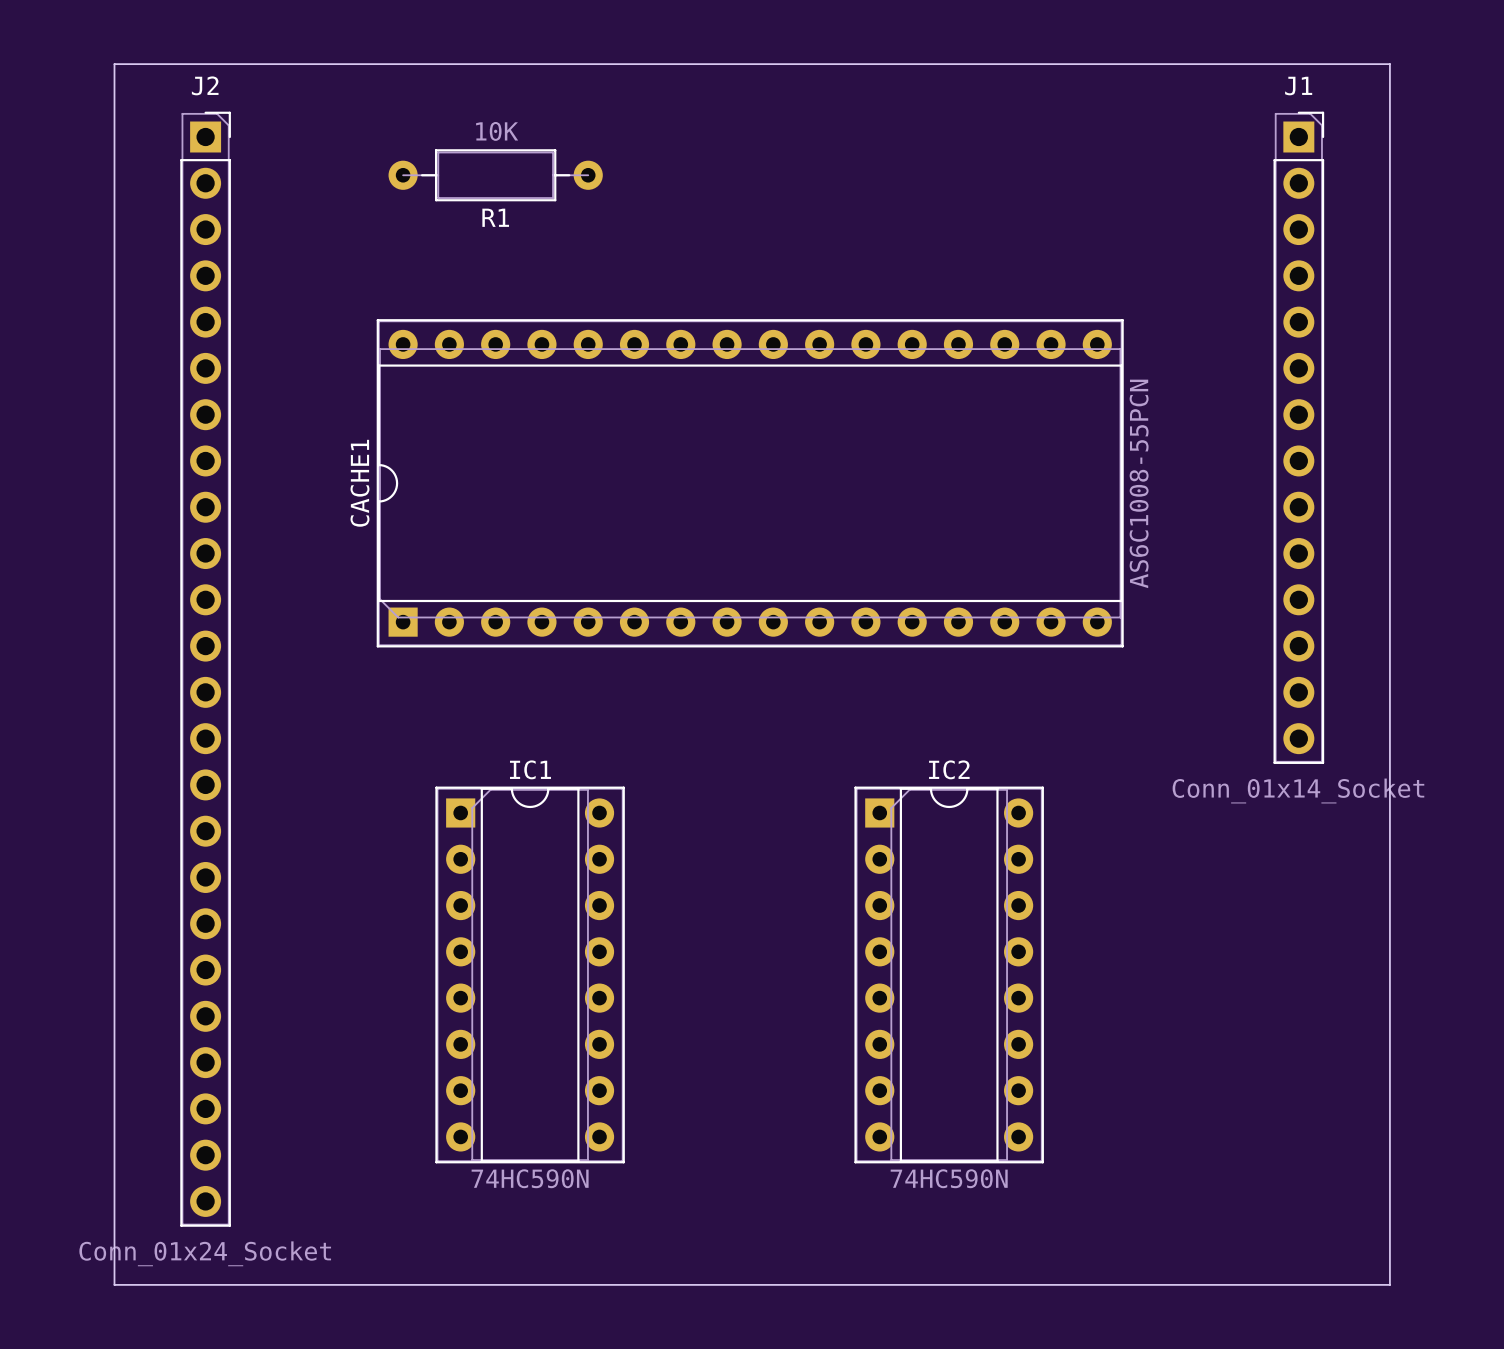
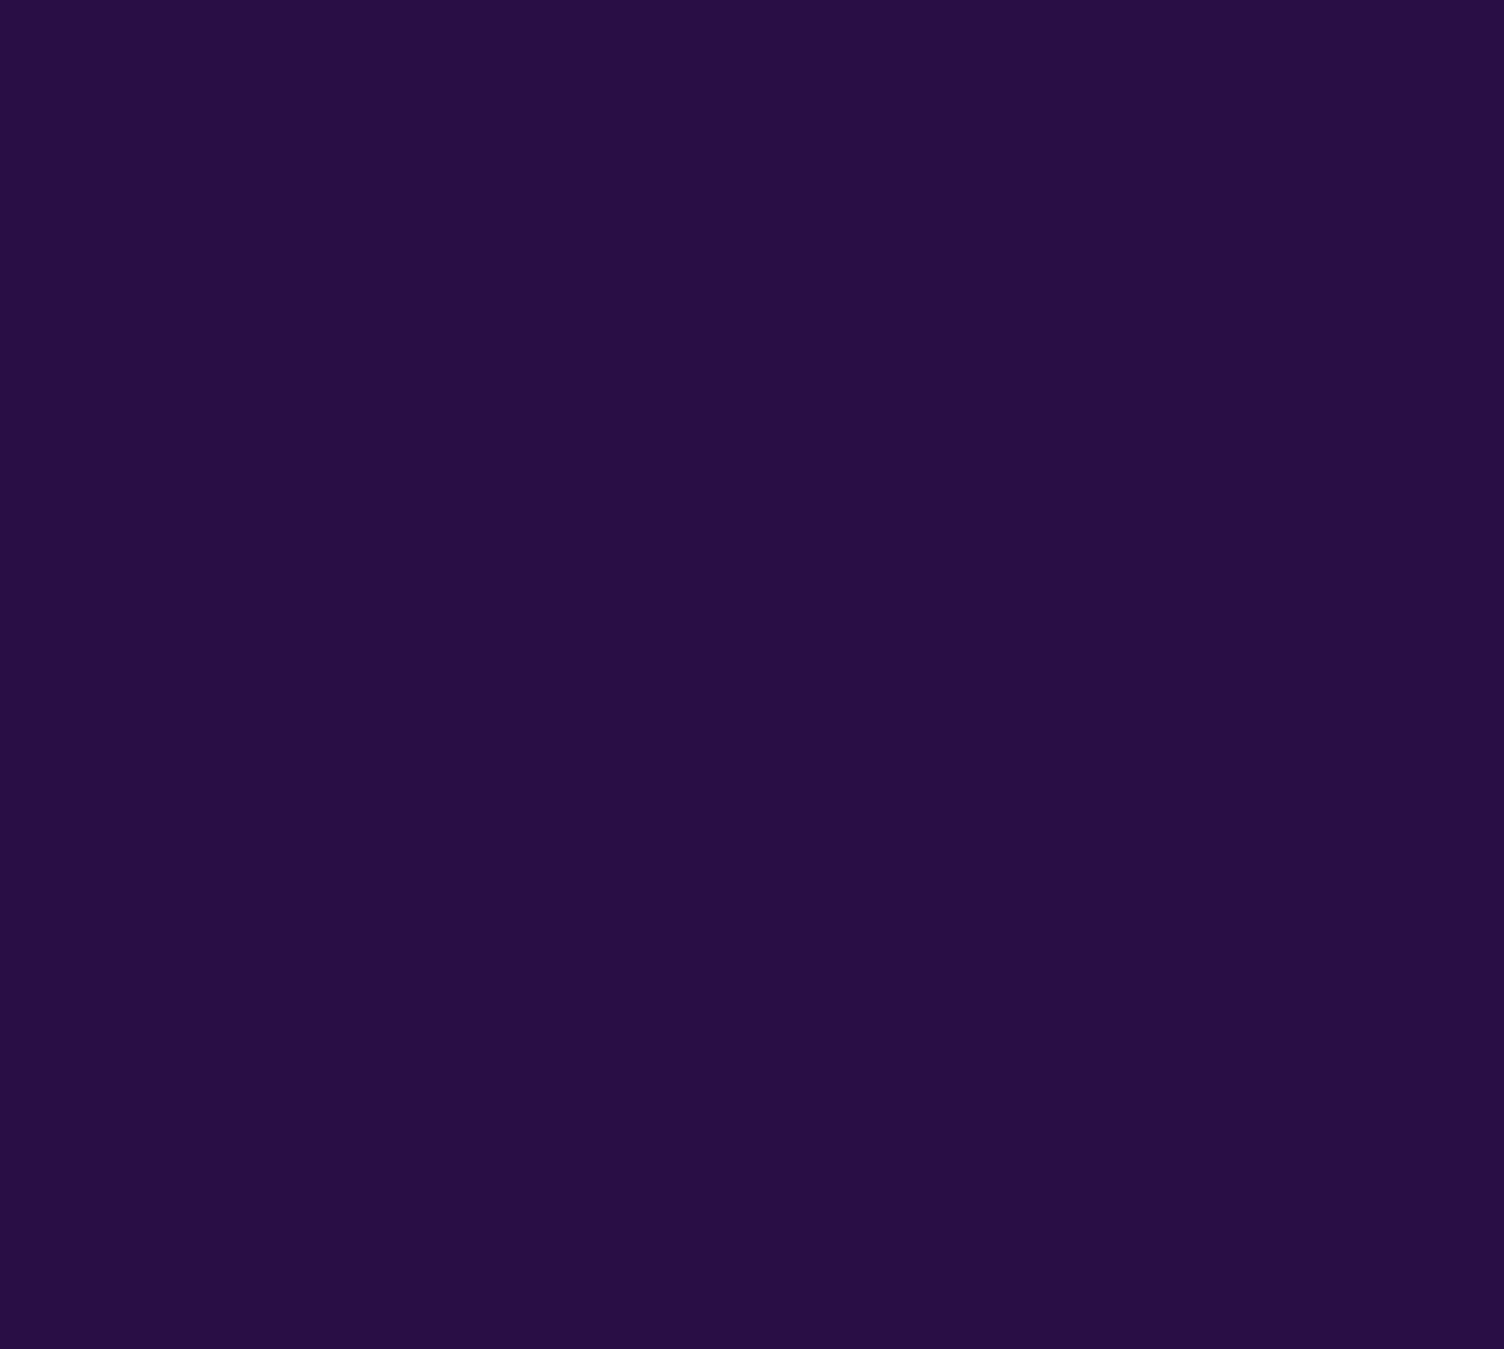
board edge: (114, 64) (1389, 64) (1389, 1284) (114, 1284) (114, 64) -> none
R1: 10K (495, 175) -> none
J1: Conn_01x14_Socket (1298, 437) -> none
CACHE1: AS6C1008-55PCN (750, 483) -> none
J2: Conn_01x24_Socket (205, 669) -> none
IC1: 74HC590N (530, 974) -> none
IC2: 74HC590N (949, 974) -> none

